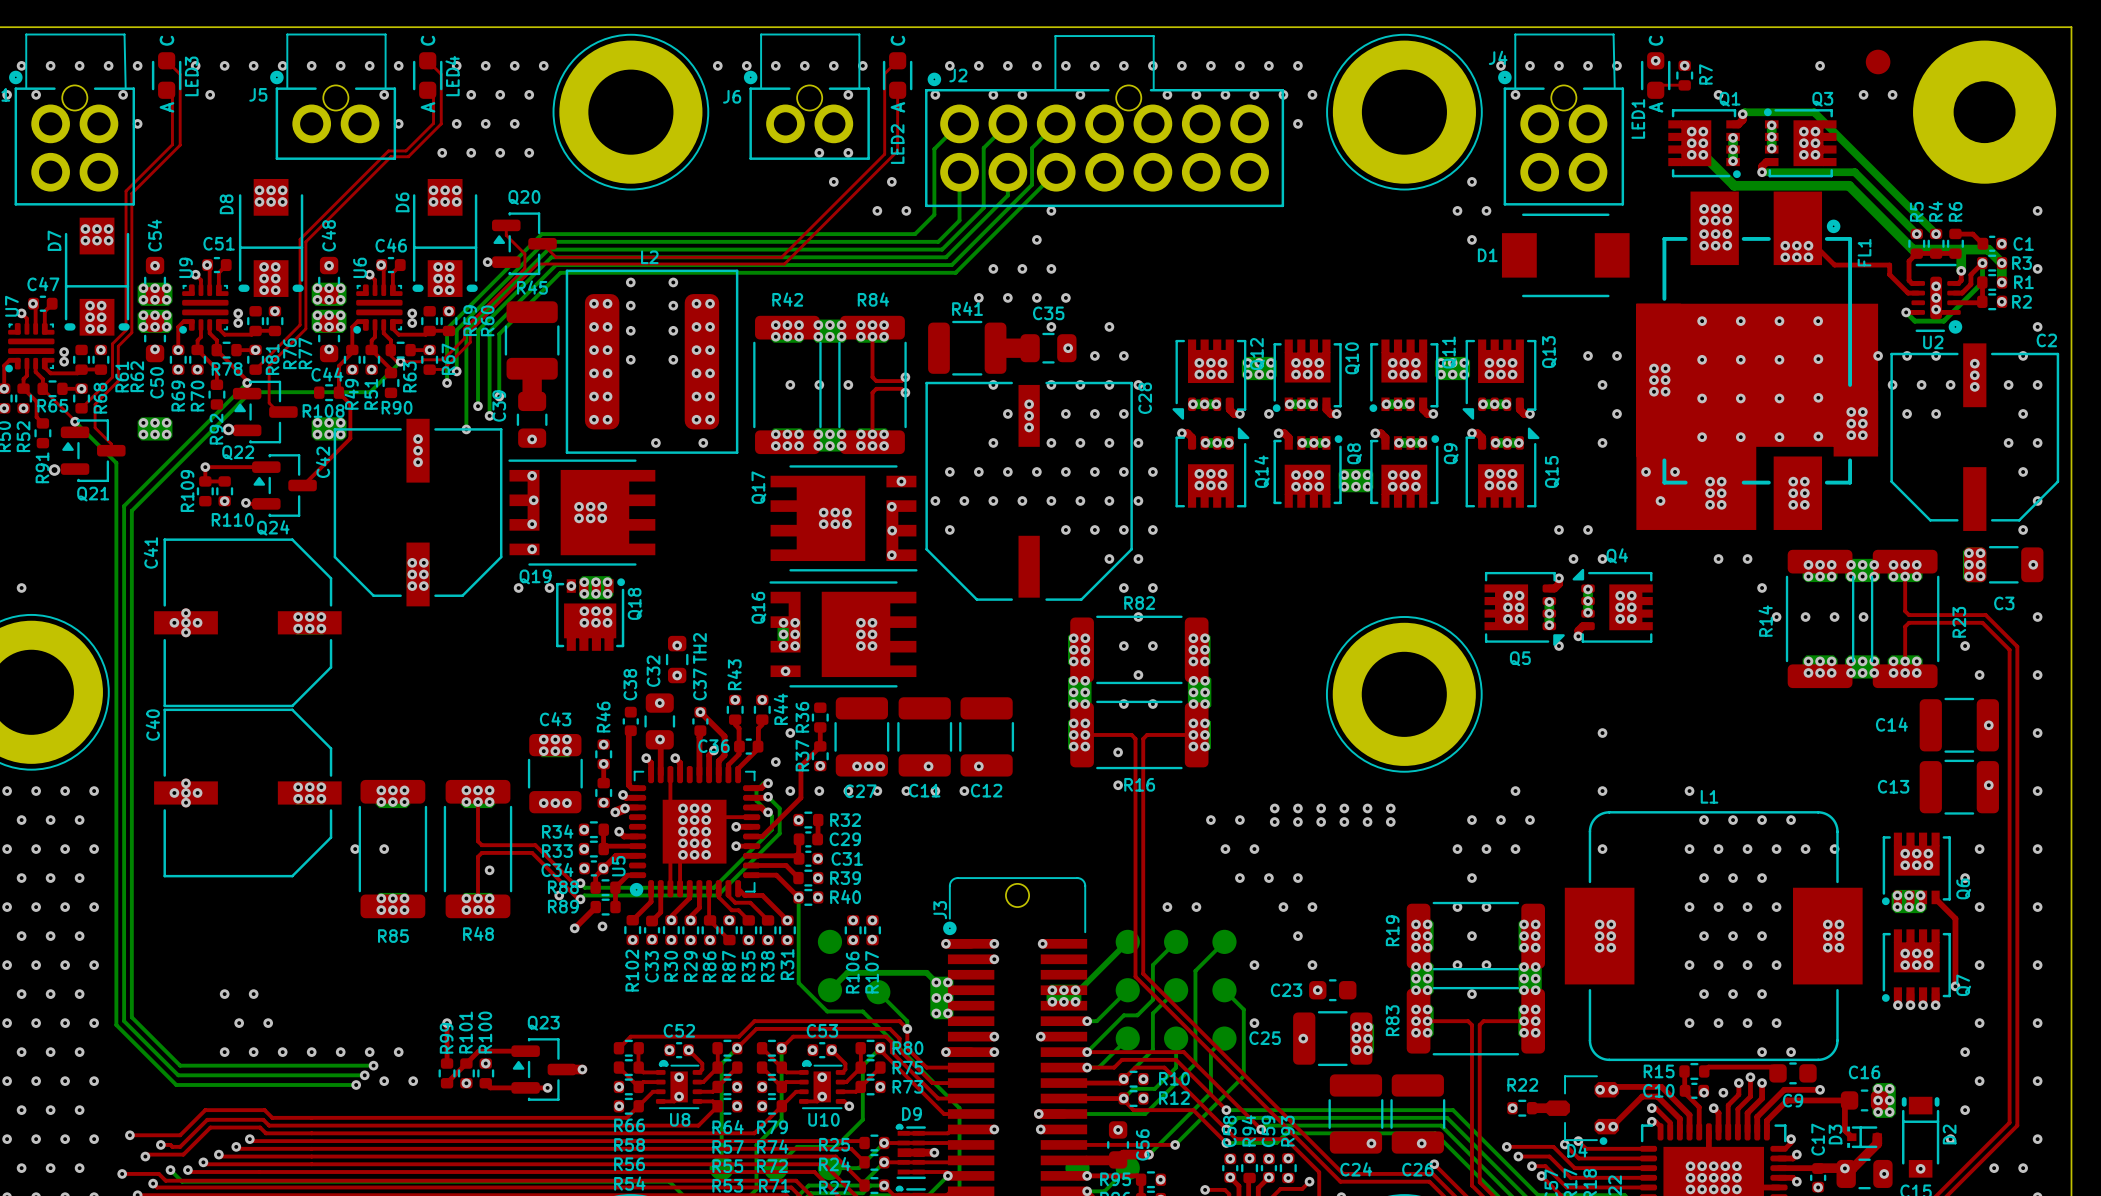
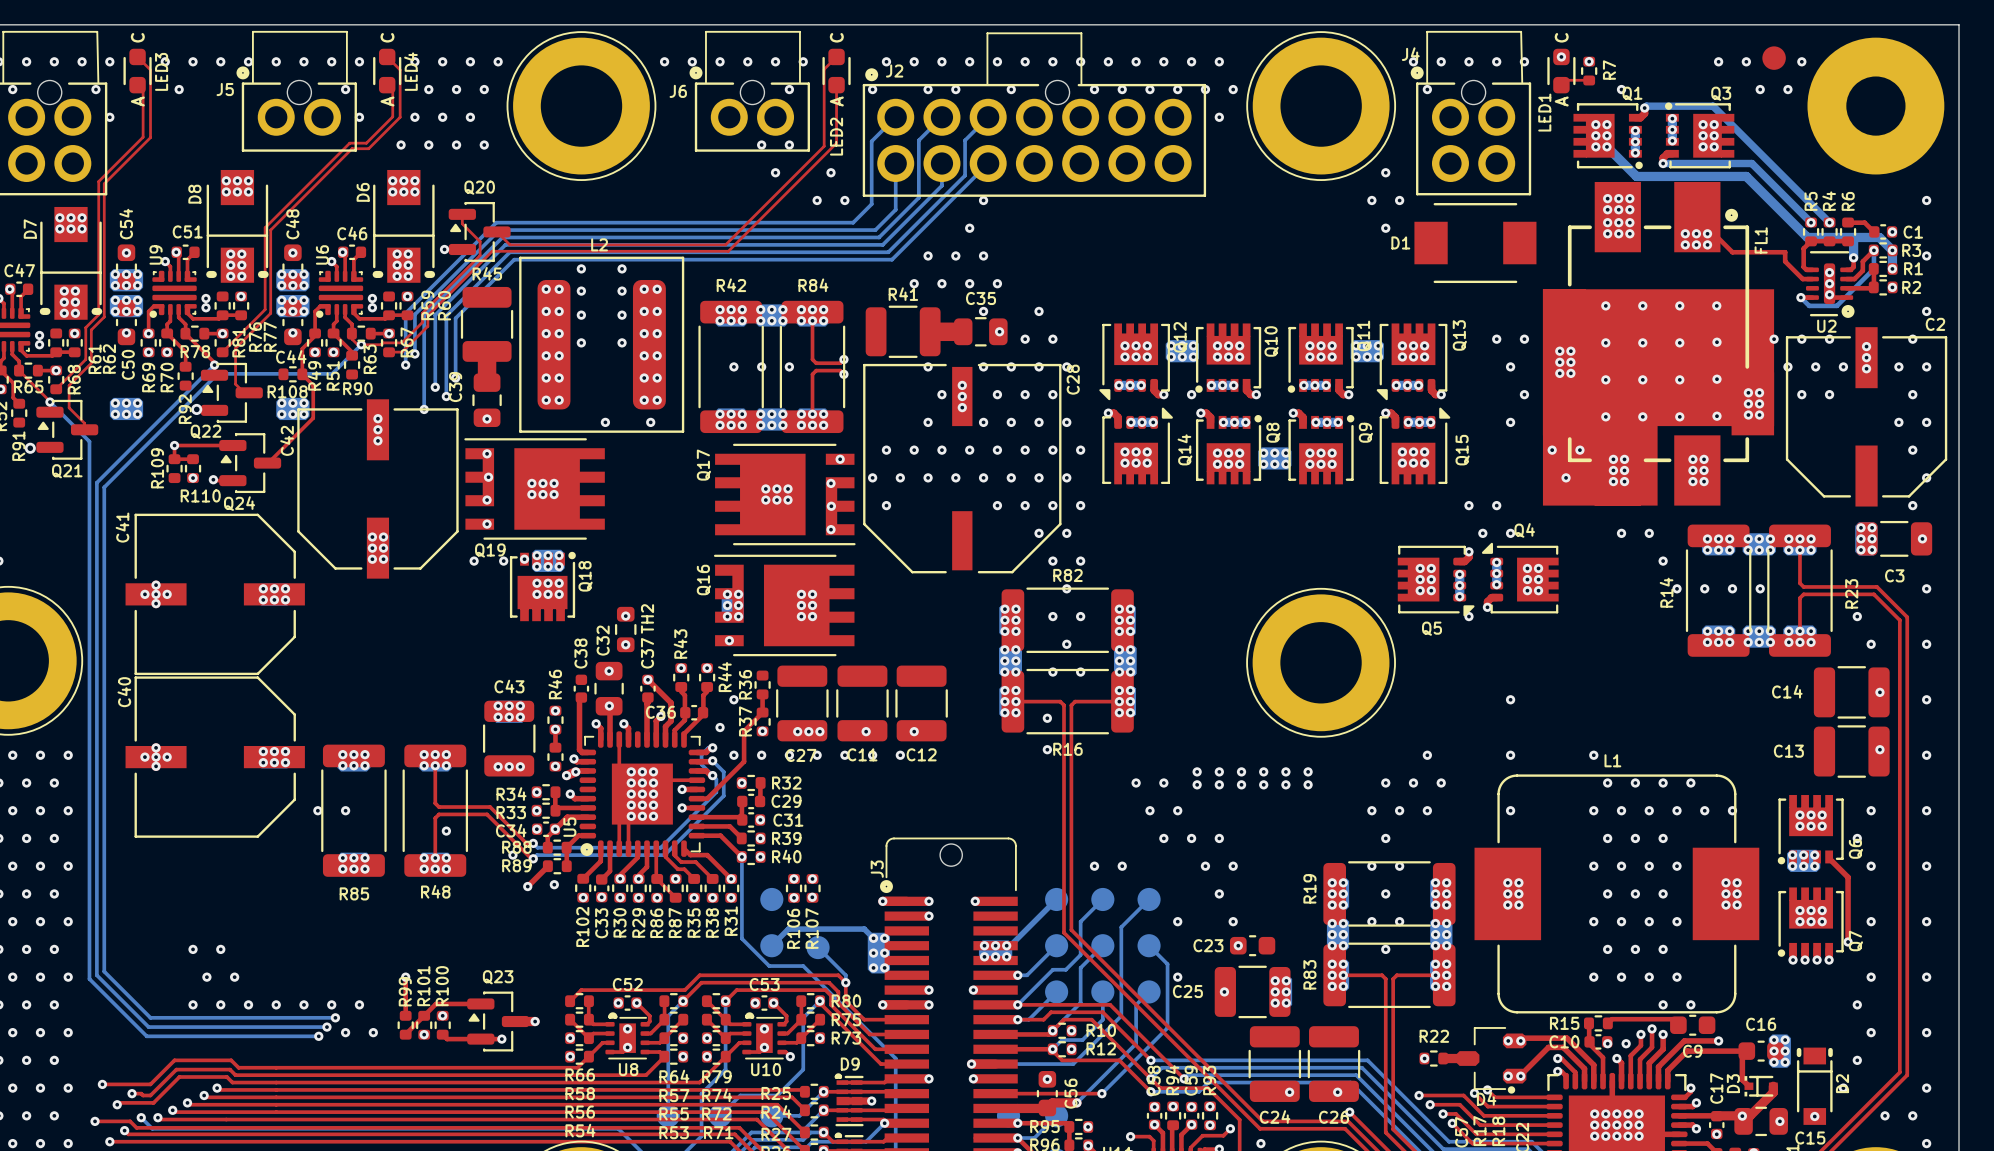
via: none -> (1746, 61)
via: none -> (1801, 61)

